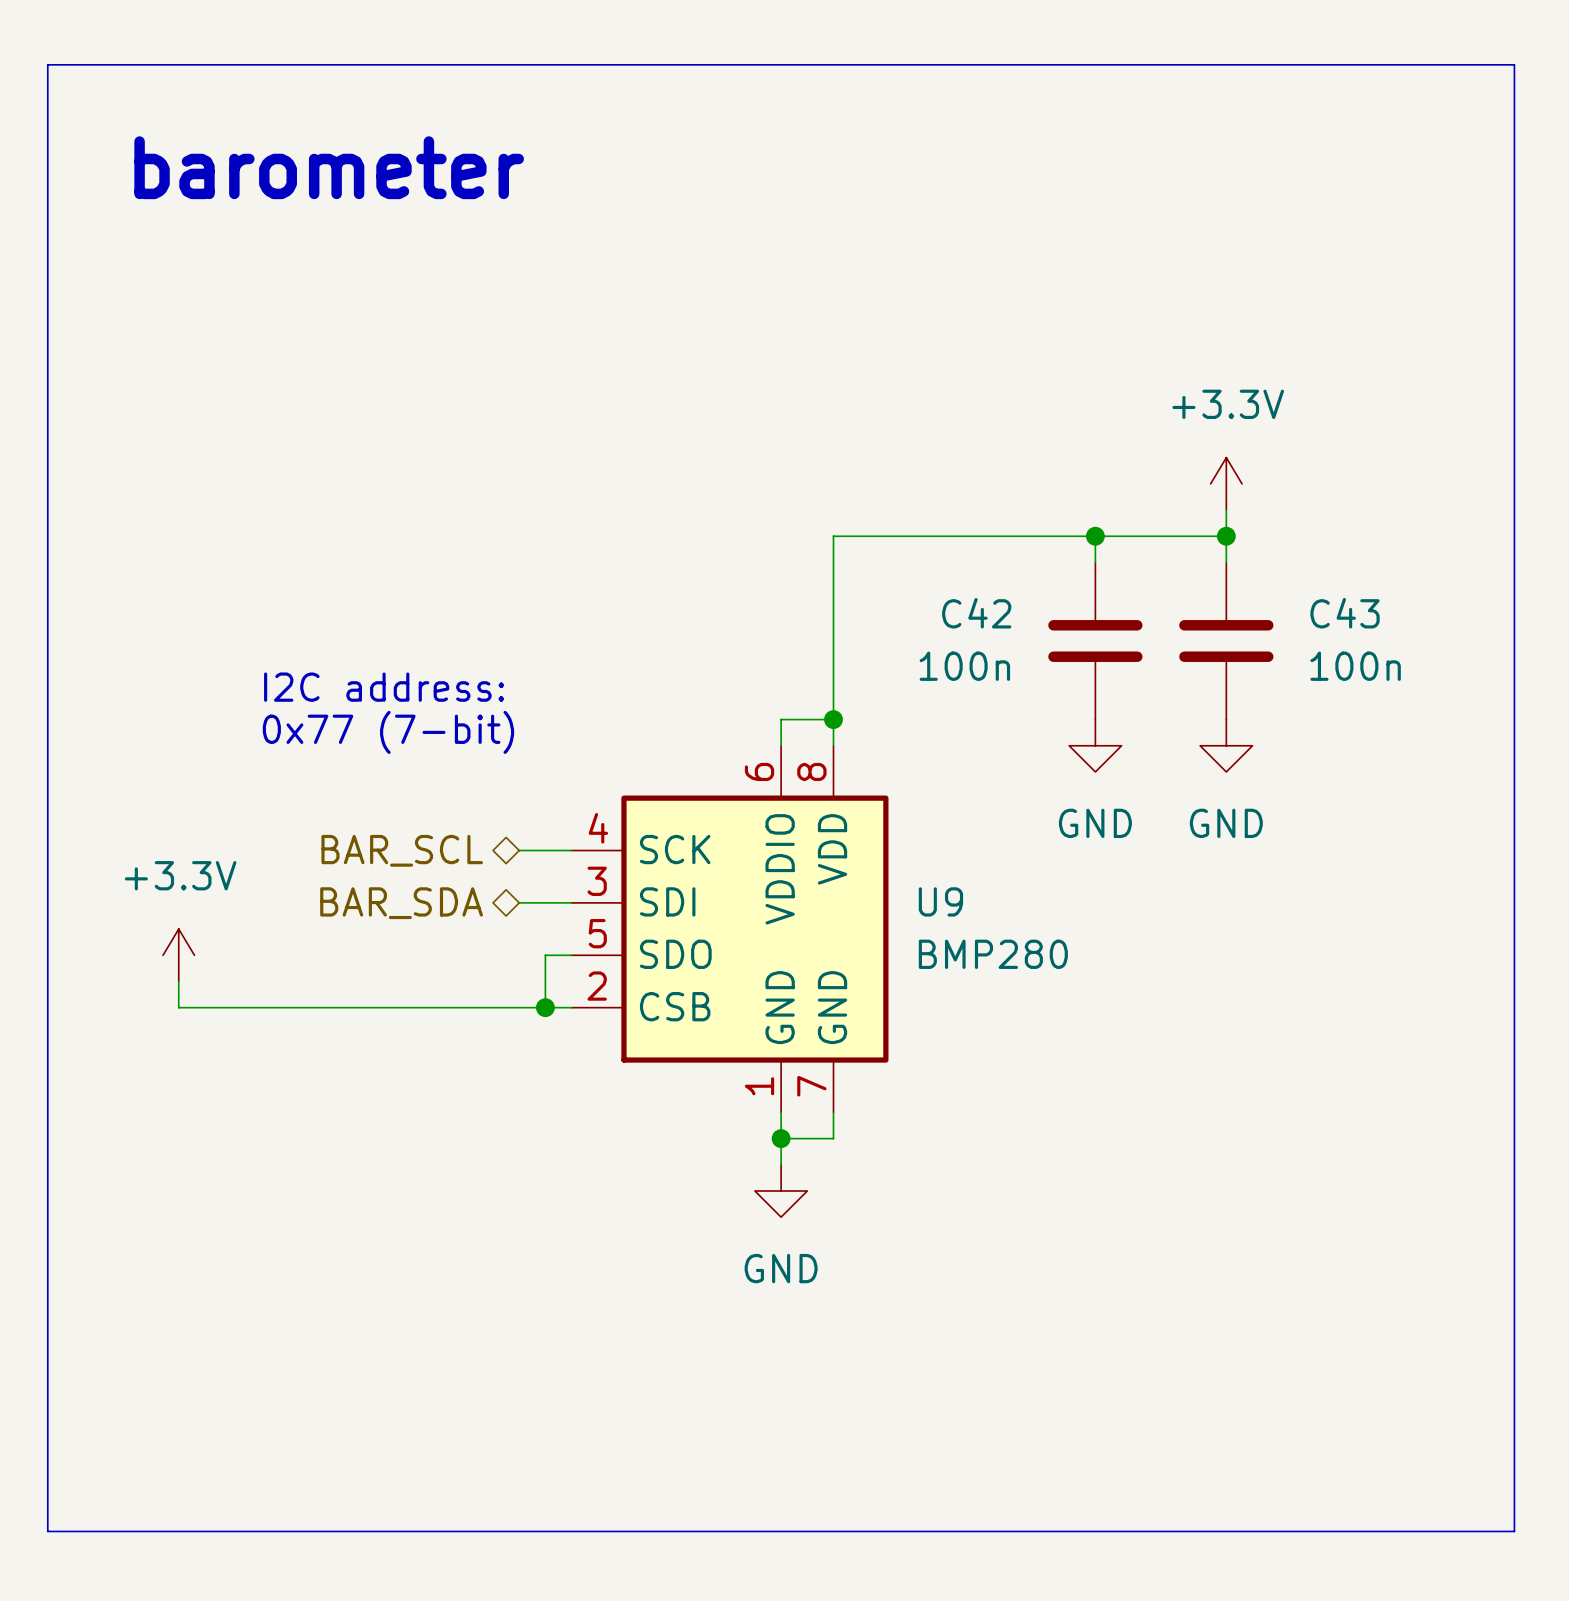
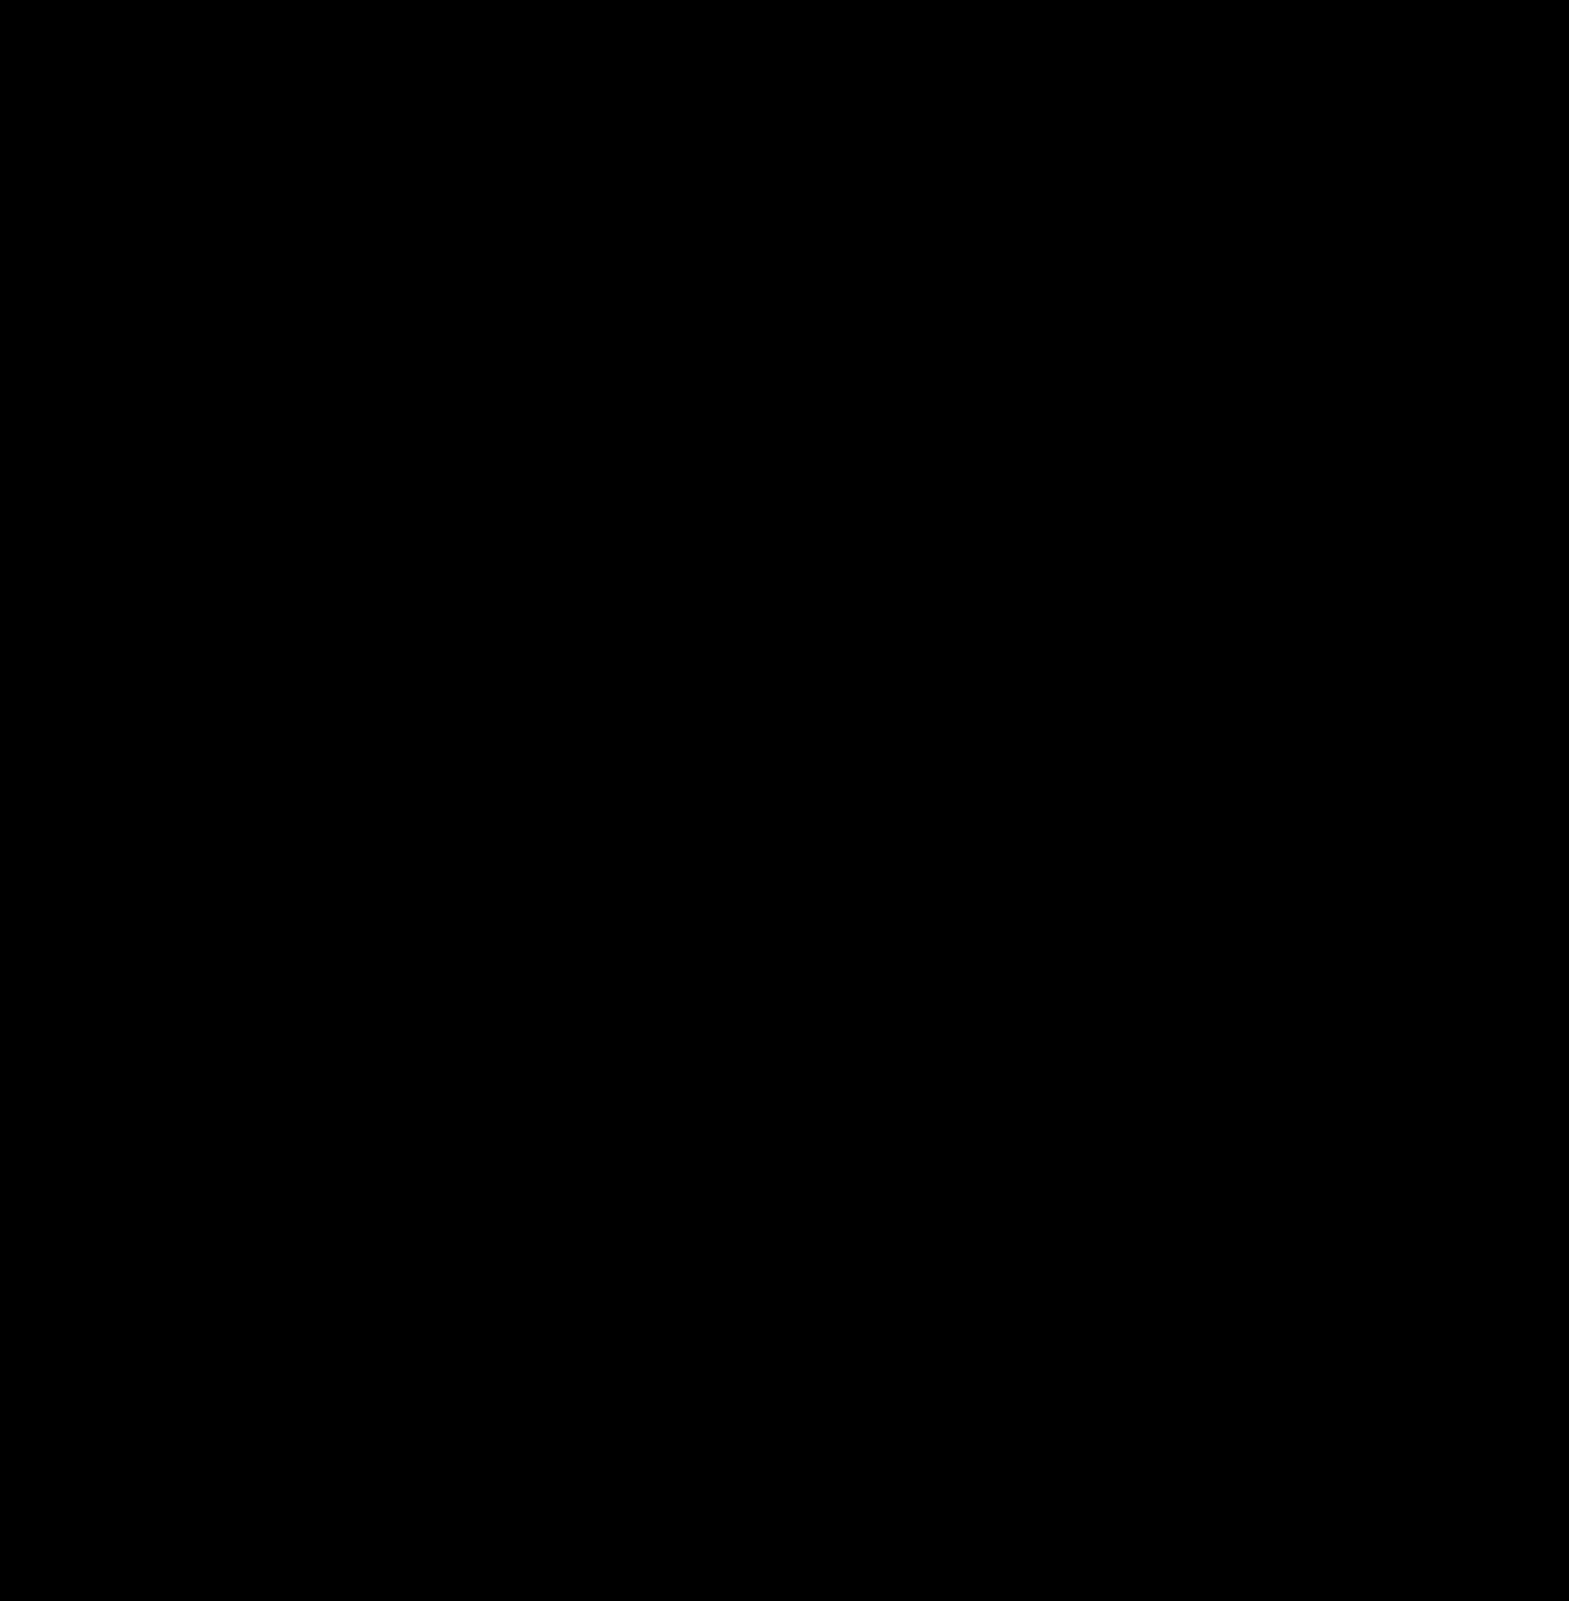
line: (47, 64) (1514, 64) (1514, 1531) (47, 1531) (47, 64) -> none
text: barometer (329, 167) -> none
power symbol: +3.3V (1226, 483) -> none
wire: (1226, 510) (1226, 562) -> none
wire: (1095, 536) (1095, 562) -> none
junction: (1095, 536) -> none
wire: (1226, 536) (833, 536) (833, 745) -> none
junction: (1226, 536) -> none
C42: 100n (1095, 641) -> none
C43: 100n (1226, 641) -> none
text: I2C address: (384, 687) -> none
wire: (833, 719) (781, 719) (781, 745) -> none
junction: (833, 719) -> none
text: 0x77 (7-bit) (388, 732) -> none
power symbol: GND (1095, 745) -> none
power symbol: GND (1226, 745) -> none
hierarchical label: BAR_SCL (402, 850) -> none
wire: (519, 850) (571, 850) -> none
wire: (519, 902) (571, 902) -> none
hierarchical label: BAR_SDA (401, 903) -> none
U9: BMP280 (730, 929) -> none
power symbol: +3.3V (178, 955) -> none
wire: (571, 955) (545, 955) (545, 1007) -> none
wire: (178, 981) (178, 1007) (571, 1007) -> none
junction: (545, 1007) -> none
wire: (781, 1112) (781, 1164) -> none
wire: (833, 1112) (833, 1138) (781, 1138) -> none
junction: (781, 1138) -> none
power symbol: GND (781, 1190) -> none

